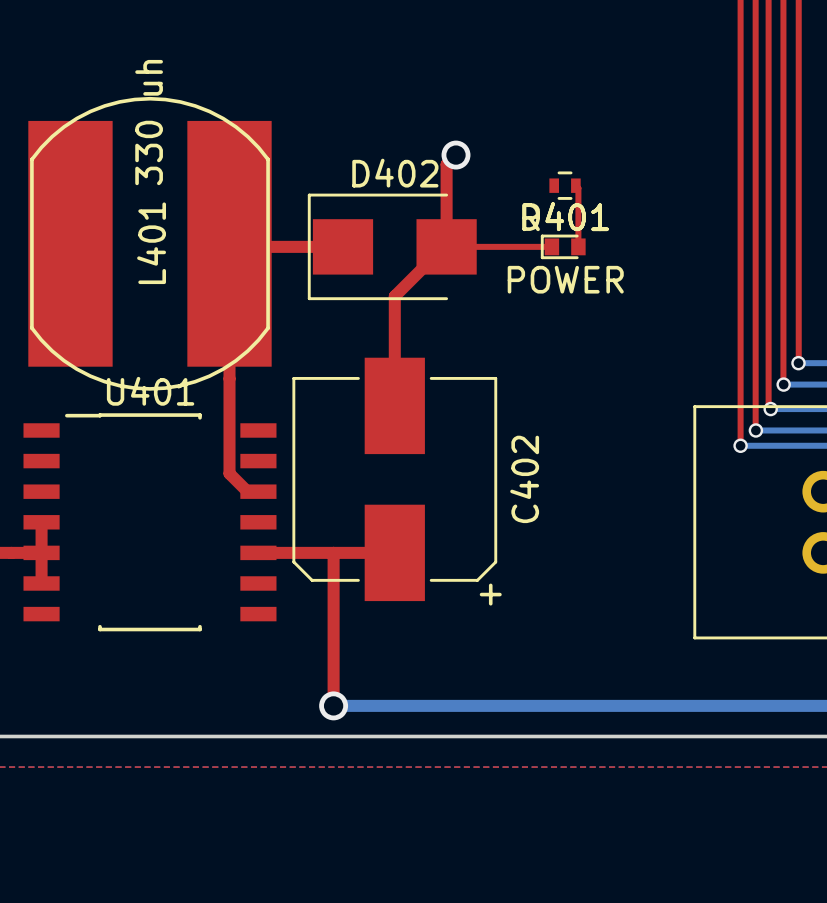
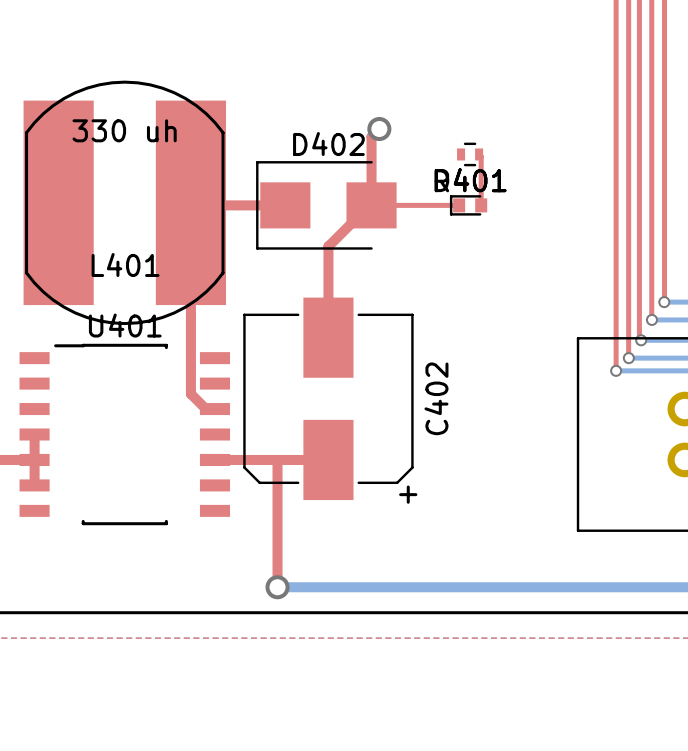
L401 value rotation: 0° (149, 122) -> 90° clockwise (124, 130)
L401 name rotation: 0° (151, 243) -> 90° clockwise (125, 265)
part value: POWER (565, 279) -> none

